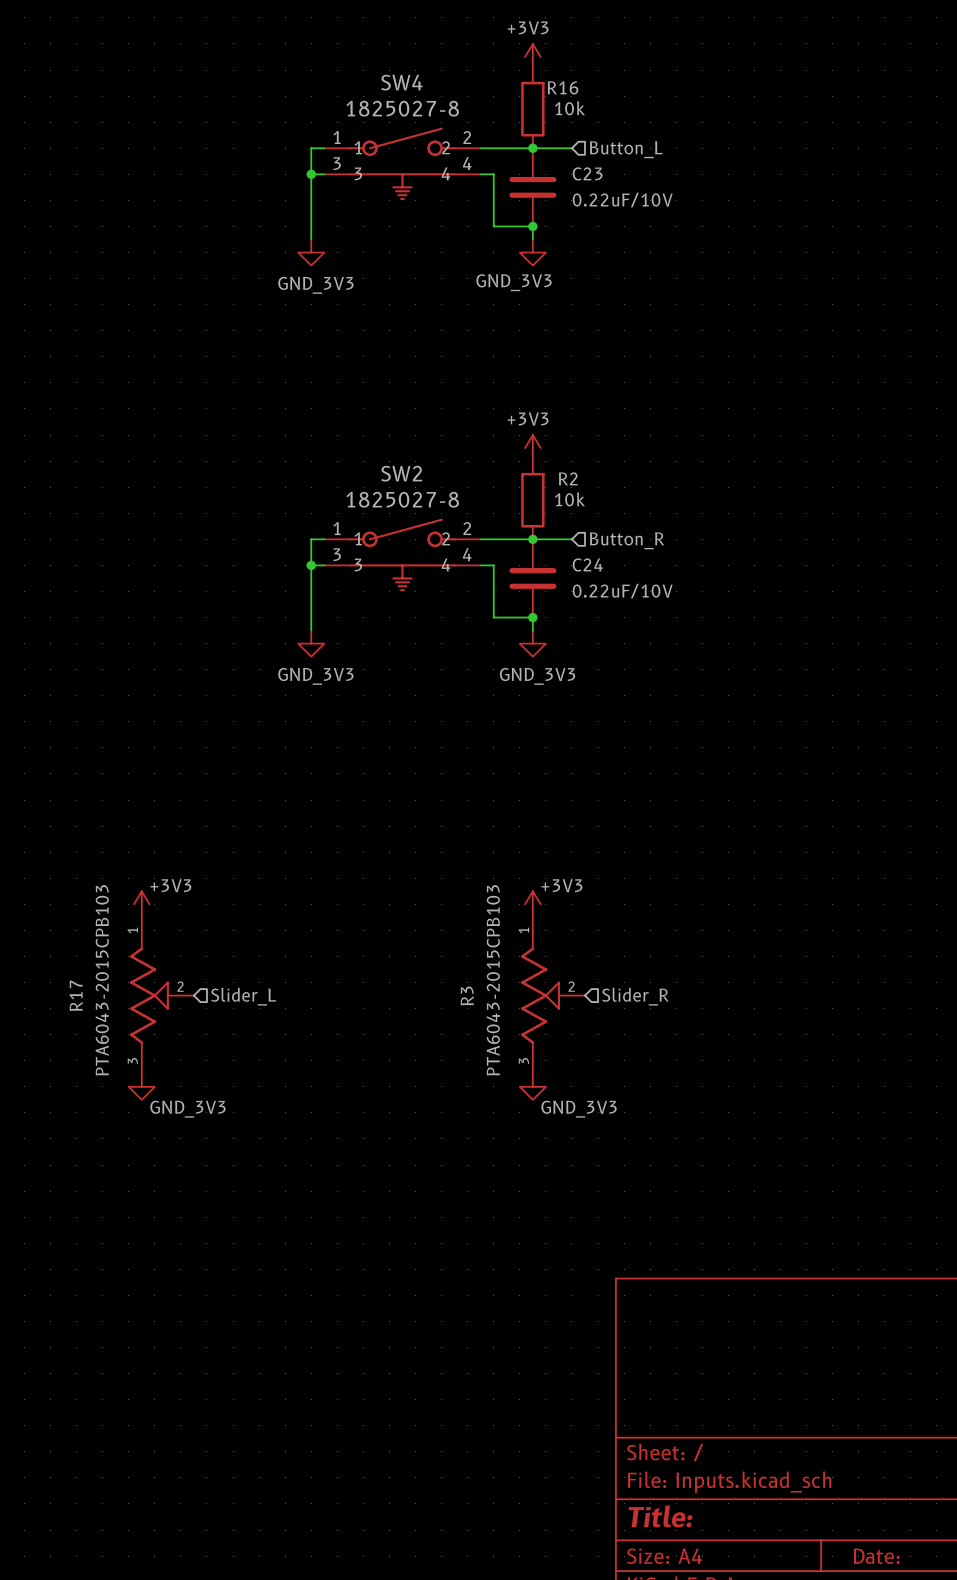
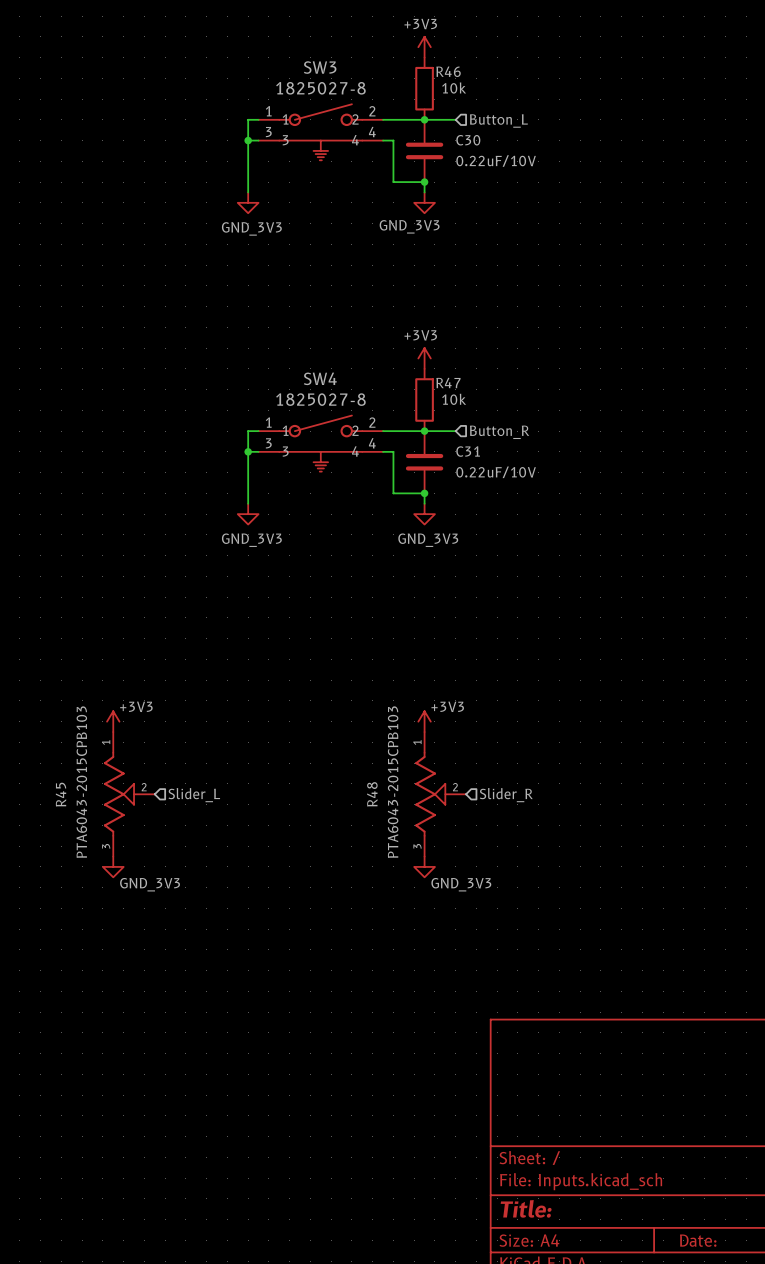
SW4 name: SW4 (401, 82) -> SW3 (320, 67)
R16 name: R16 (562, 87) -> R46 (448, 71)
C23 name: C23 (587, 173) -> C30 (468, 140)
SW2 name: SW2 (401, 473) -> SW4 (320, 378)
R2 name: R2 (568, 478) -> R47 (448, 383)
C24 name: C24 (587, 564) -> C31 (468, 451)
R17 name: R17 (76, 995) -> R45 (61, 794)
R3 name: R3 (467, 995) -> R48 (372, 794)

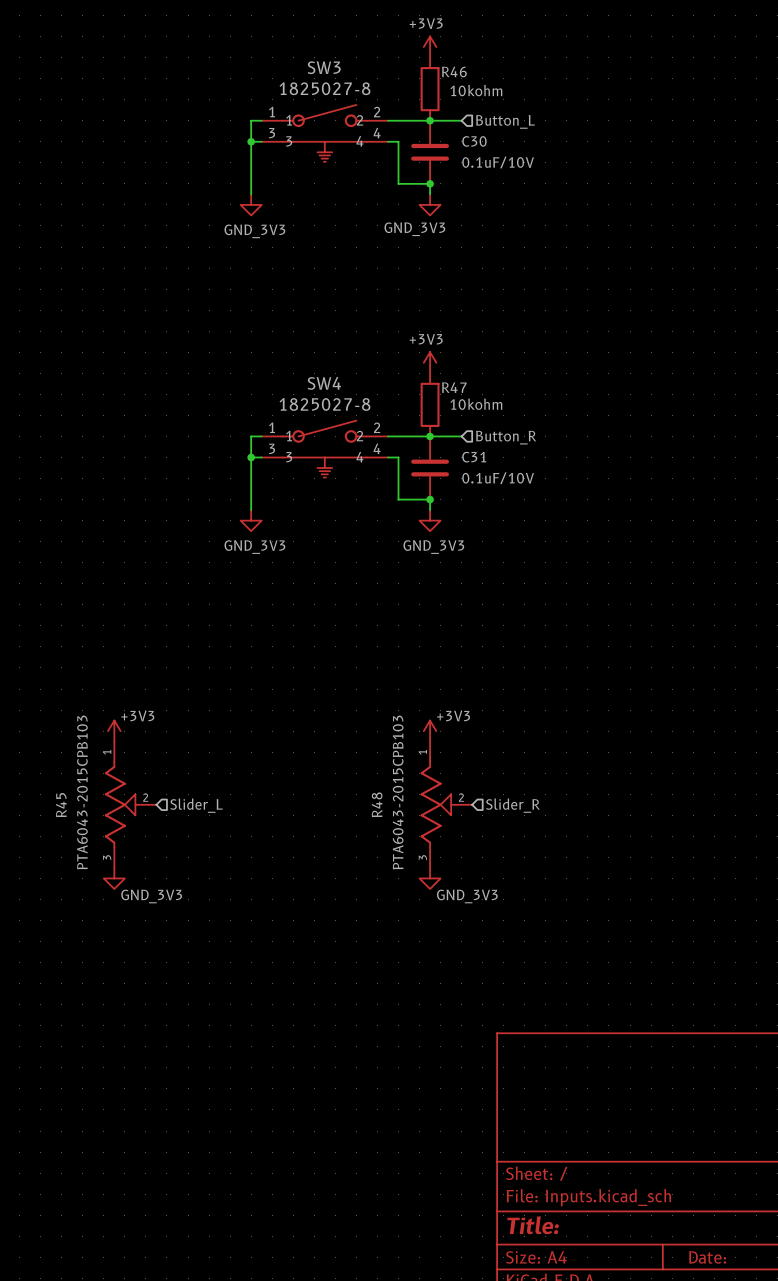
R46 value: 10k (454, 88) -> 10kohm (476, 90)
C30 value: 0.22uF/10V (496, 161) -> 0.1uF/10V (498, 162)
R47 value: 10k (454, 399) -> 10kohm (476, 404)
C31 value: 0.22uF/10V (496, 472) -> 0.1uF/10V (498, 478)

